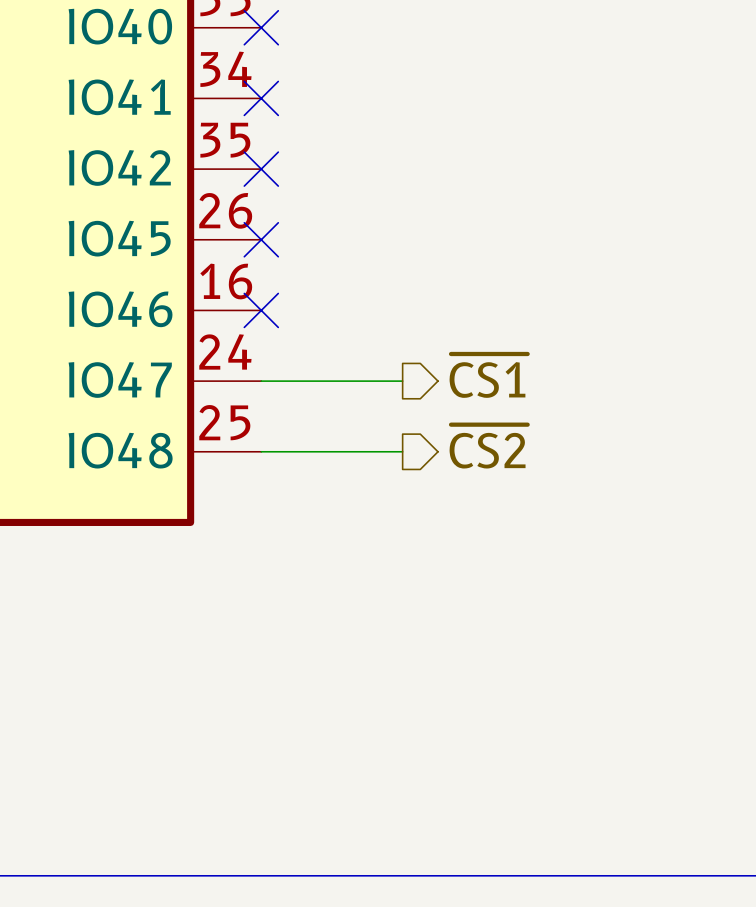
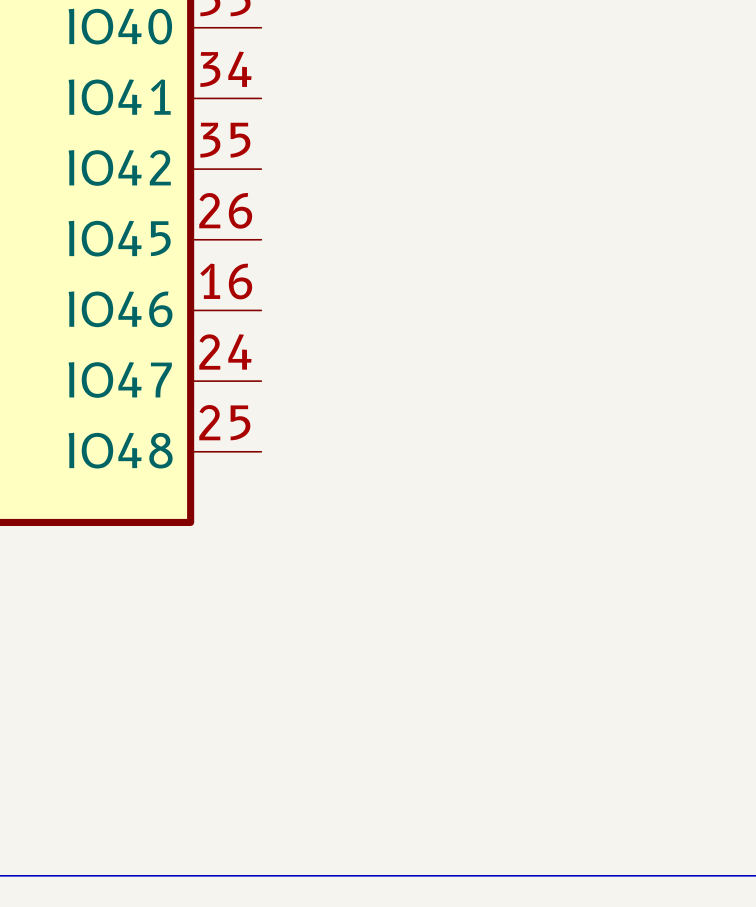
no-connect mark: (261, 27) -> none
no-connect mark: (261, 98) -> none
no-connect mark: (261, 169) -> none
no-connect mark: (261, 239) -> none
no-connect mark: (261, 310) -> none
hierarchical label: ~{CS1} (488, 375) -> none
wire: (261, 381) (402, 381) -> none
hierarchical label: ~{CS2} (488, 446) -> none
wire: (261, 451) (402, 451) -> none

